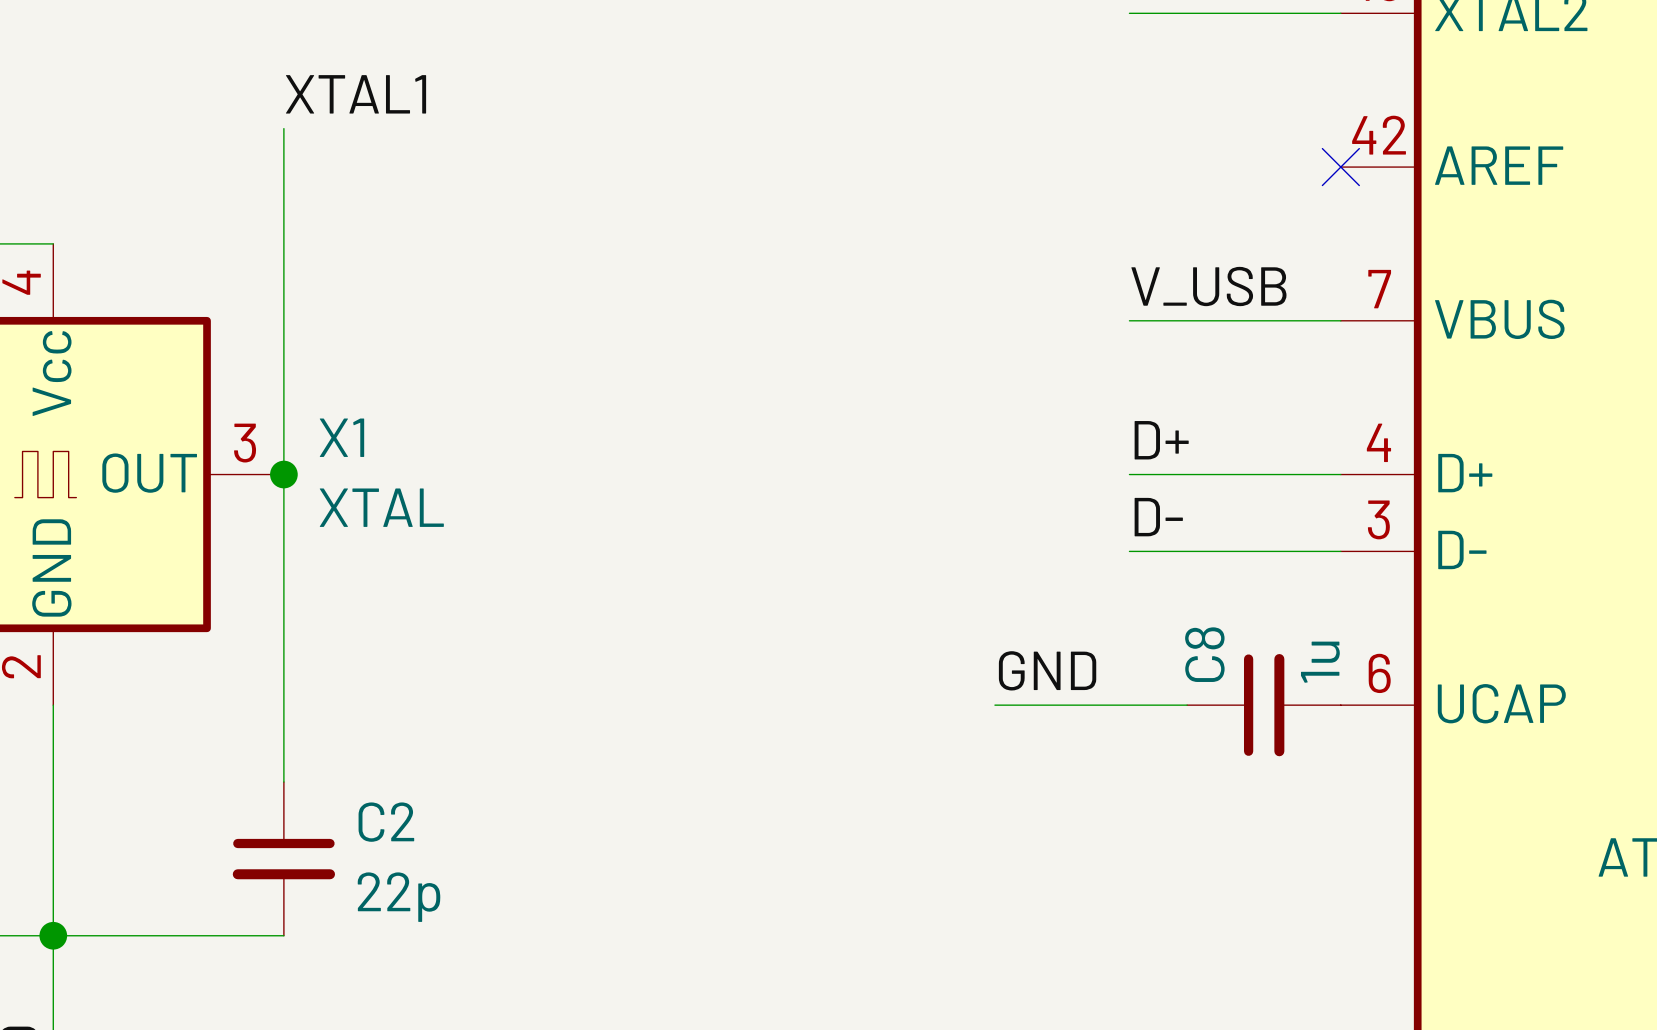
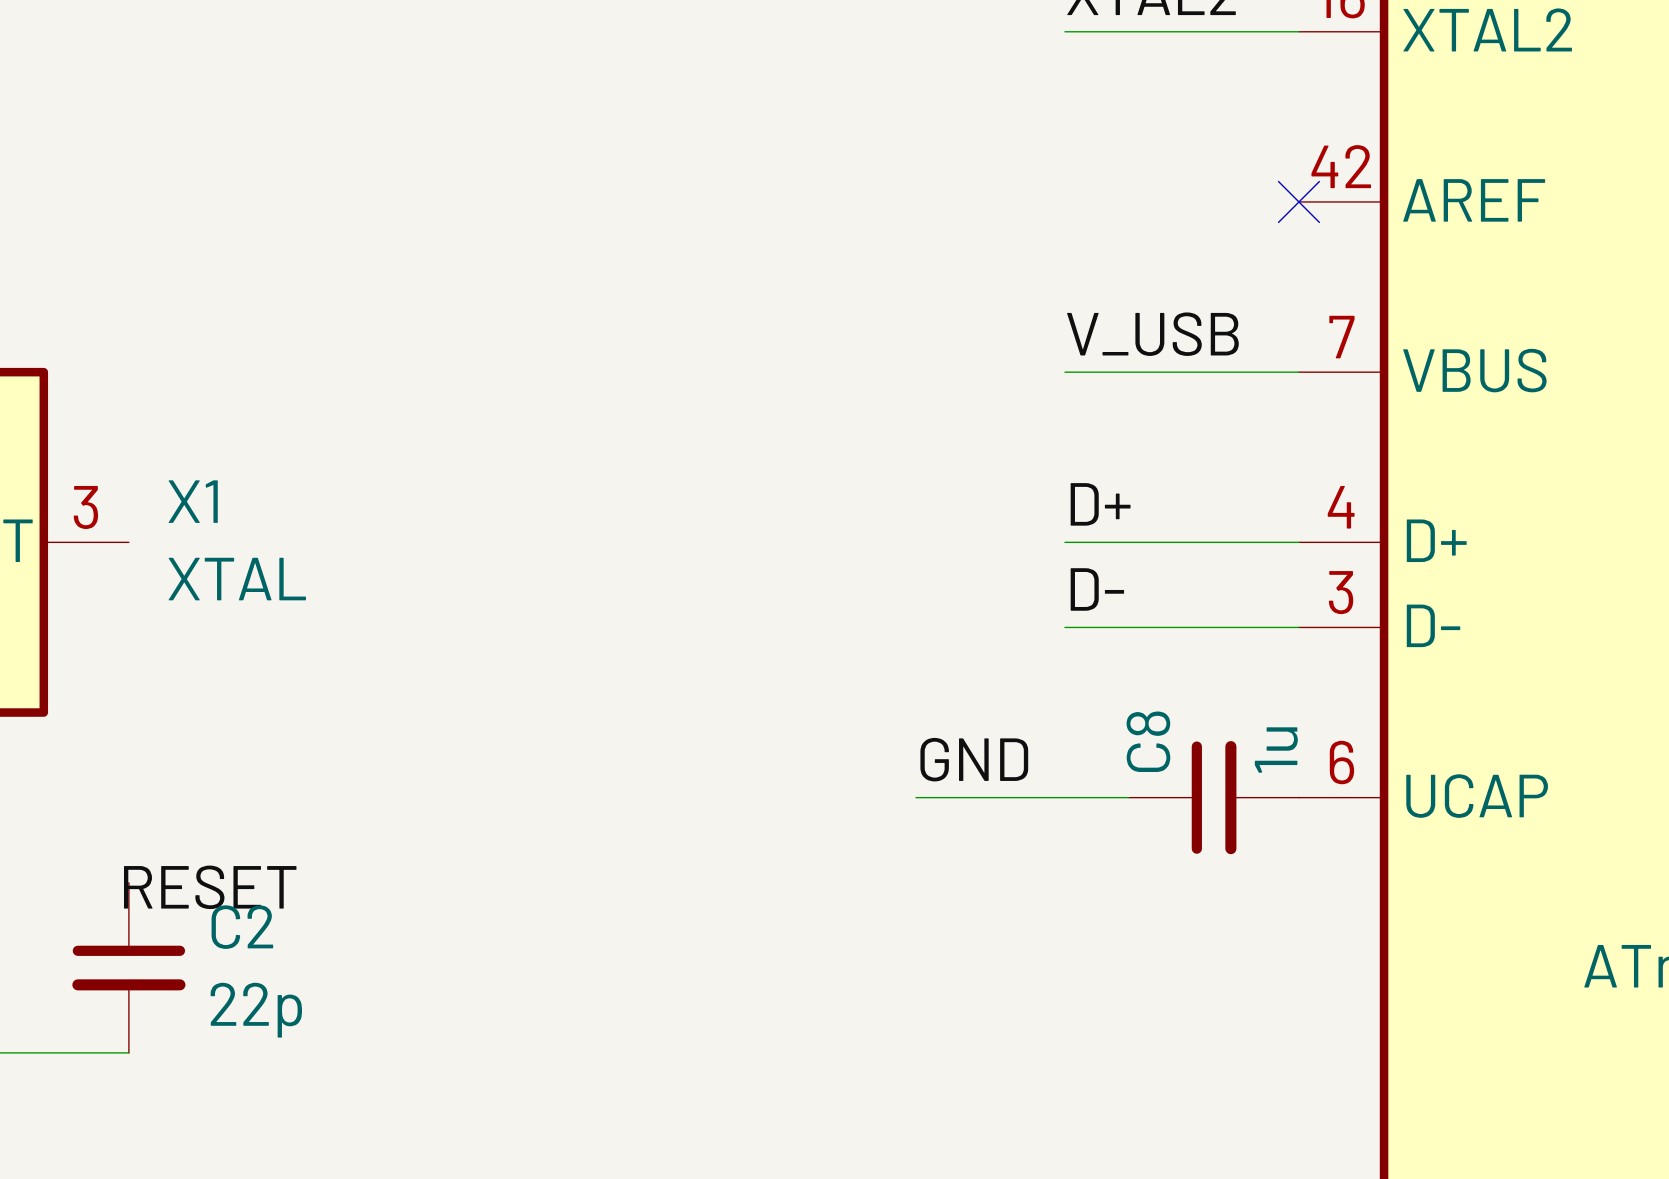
label: XTAL1 (356, 94) -> none
wire: (283, 128) (283, 782) -> none
junction: (283, 474) -> none
label: none -> RESET (210, 887)

